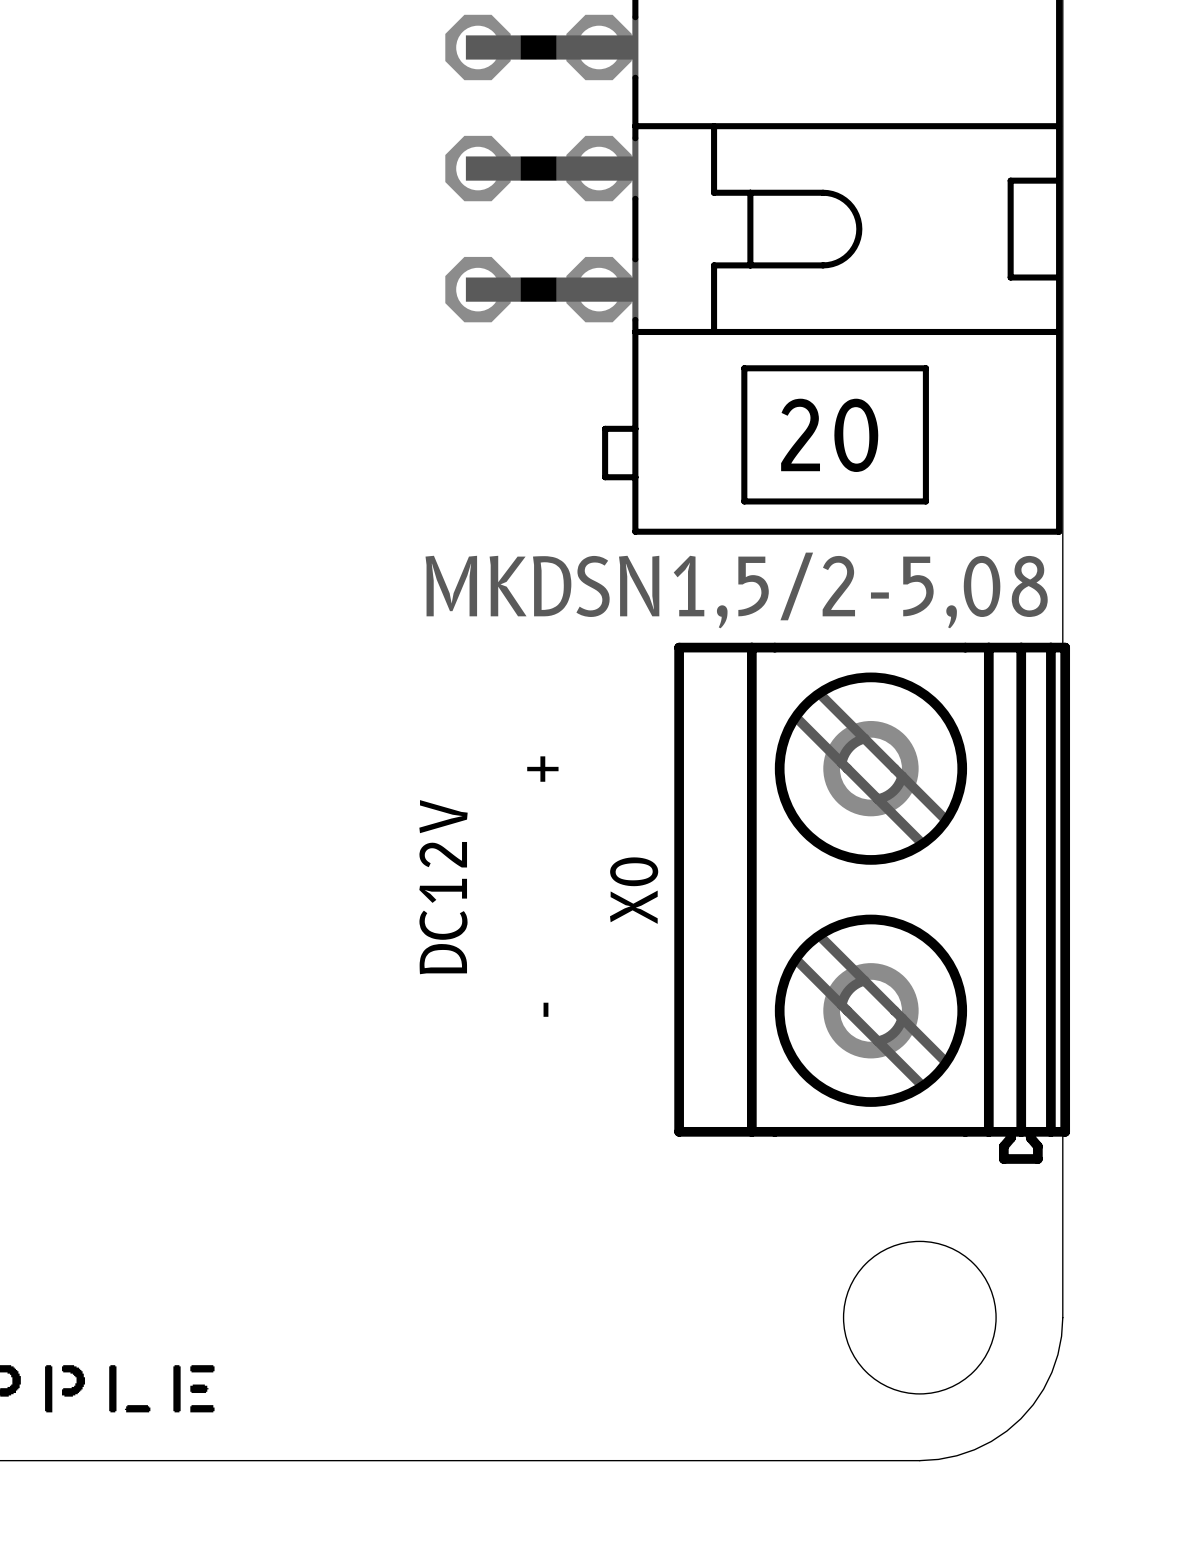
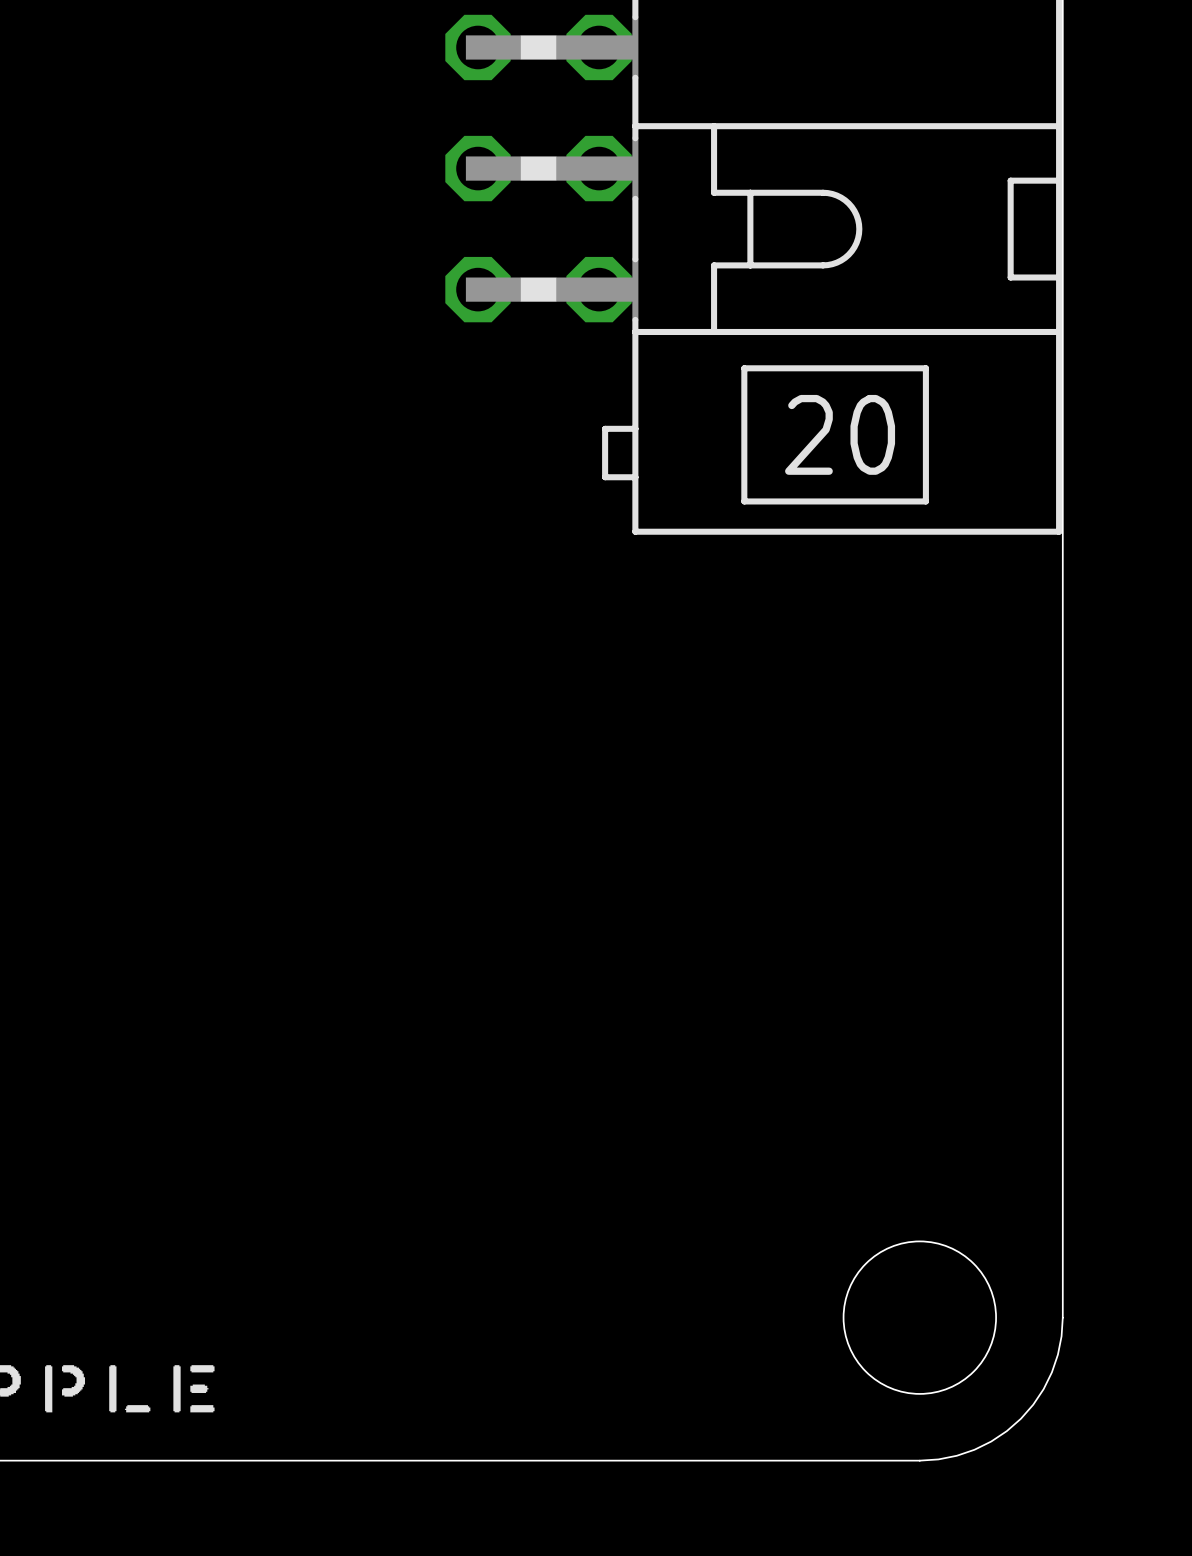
text: + (542, 769) -> none
text: DC12V (443, 887) -> none
X0: MKDSN1,5/2-5,08 (872, 903) -> none
text: - (545, 1009) -> none

